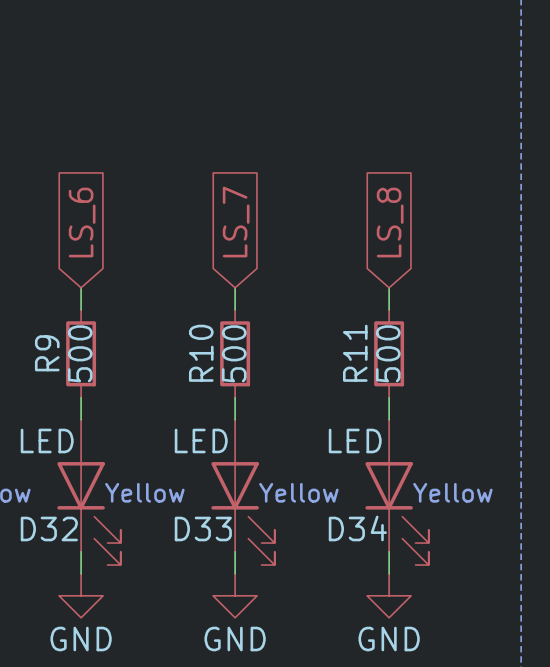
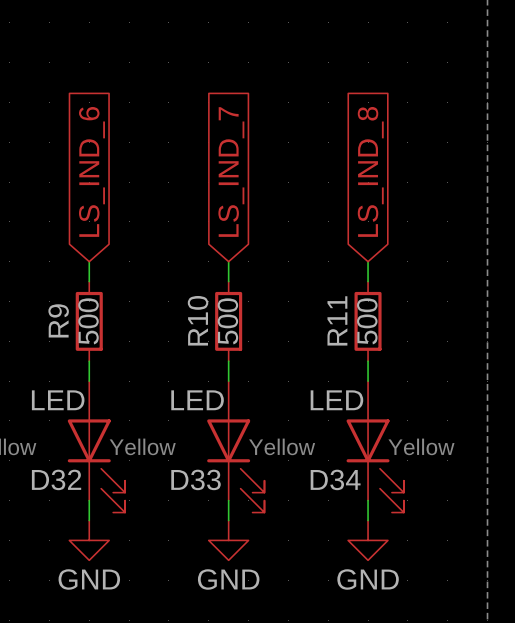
global label: LS_6 (82, 222) -> LS_IND_6 (91, 171)
global label: LS_7 (236, 222) -> LS_IND_7 (231, 172)
global label: LS_8 (390, 222) -> LS_IND_8 (370, 171)

